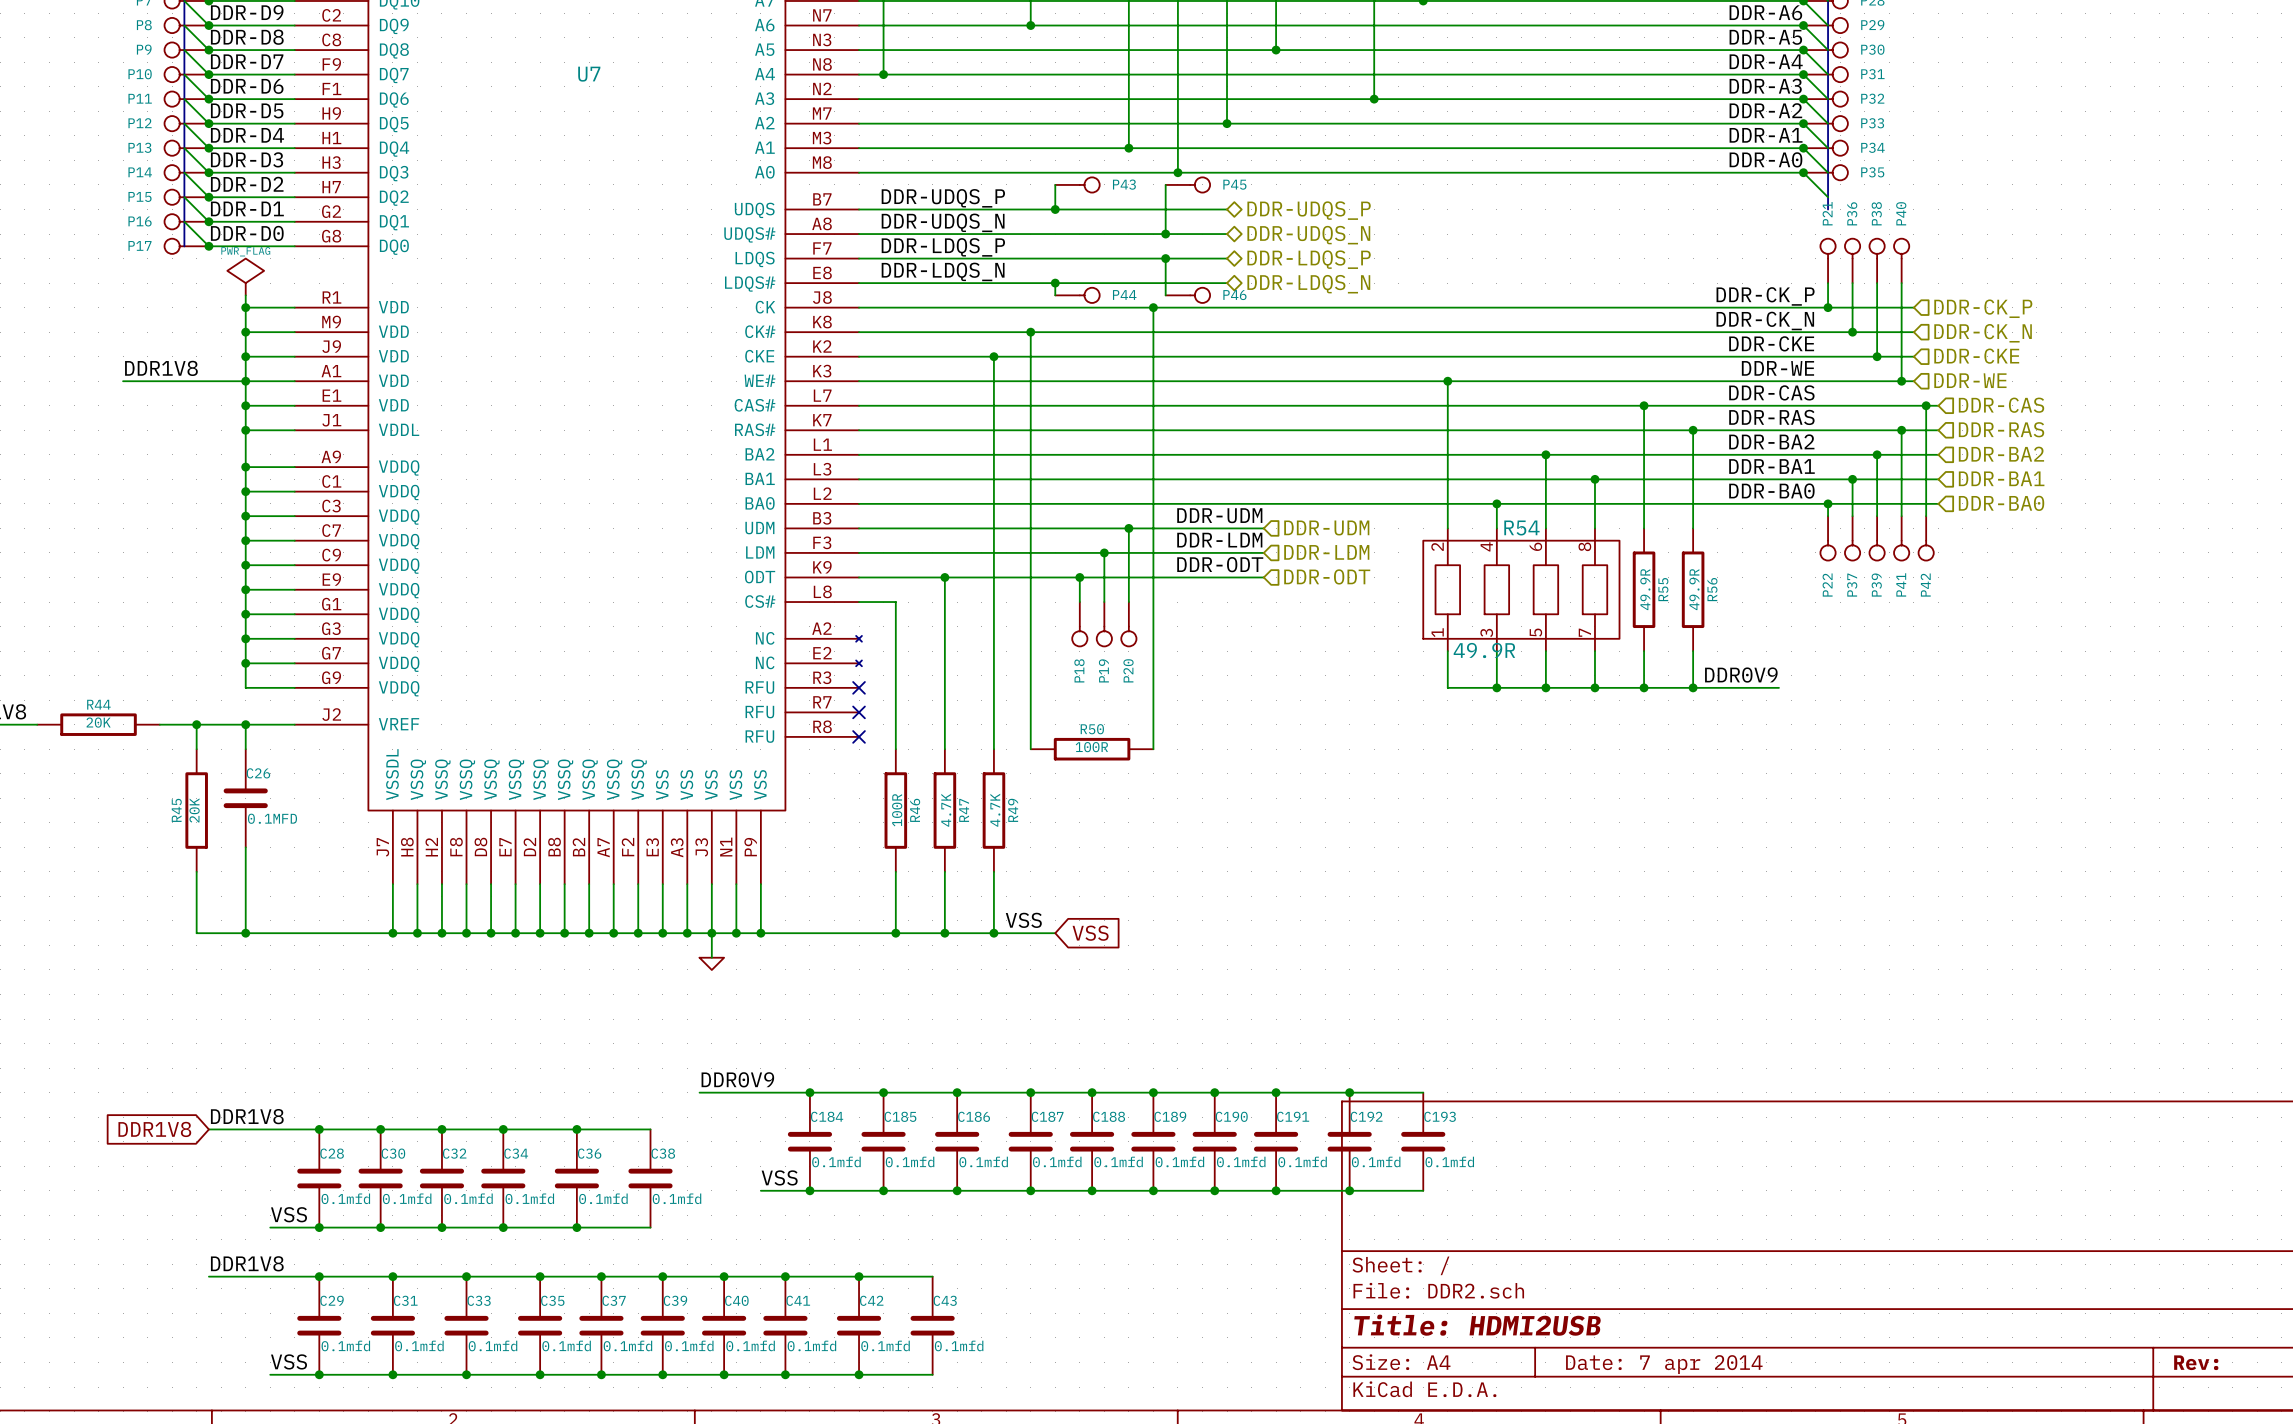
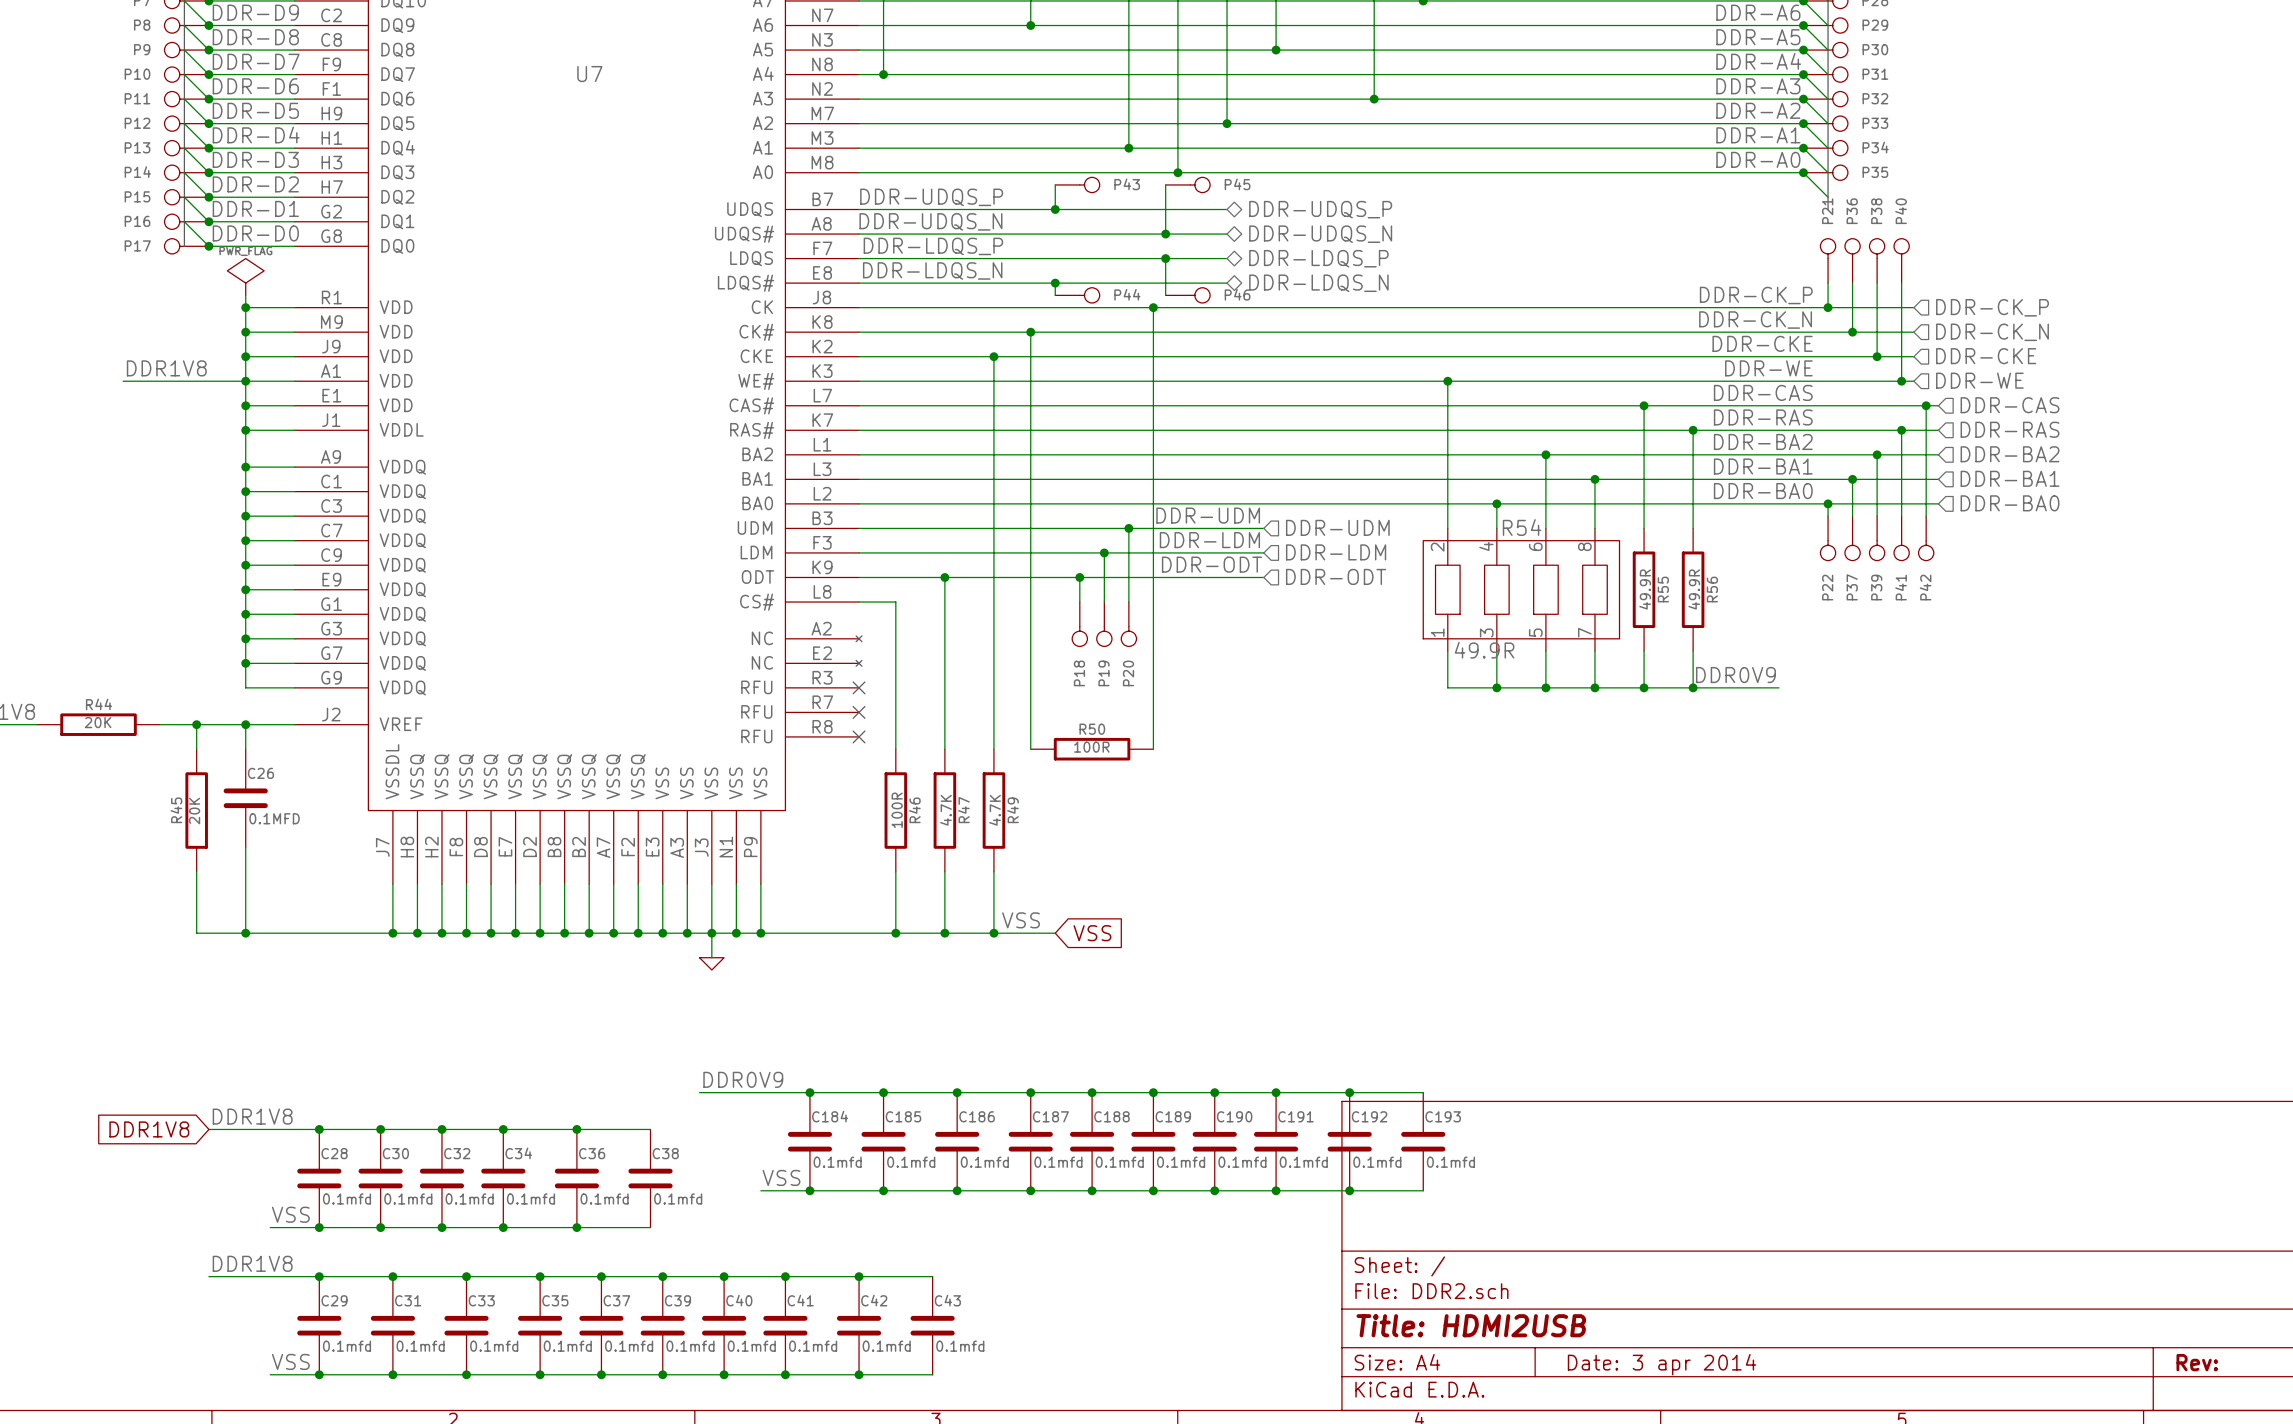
title block: Date: 7 apr 2014 (1664, 1364) -> Date: 3 apr 2014 (1661, 1364)

